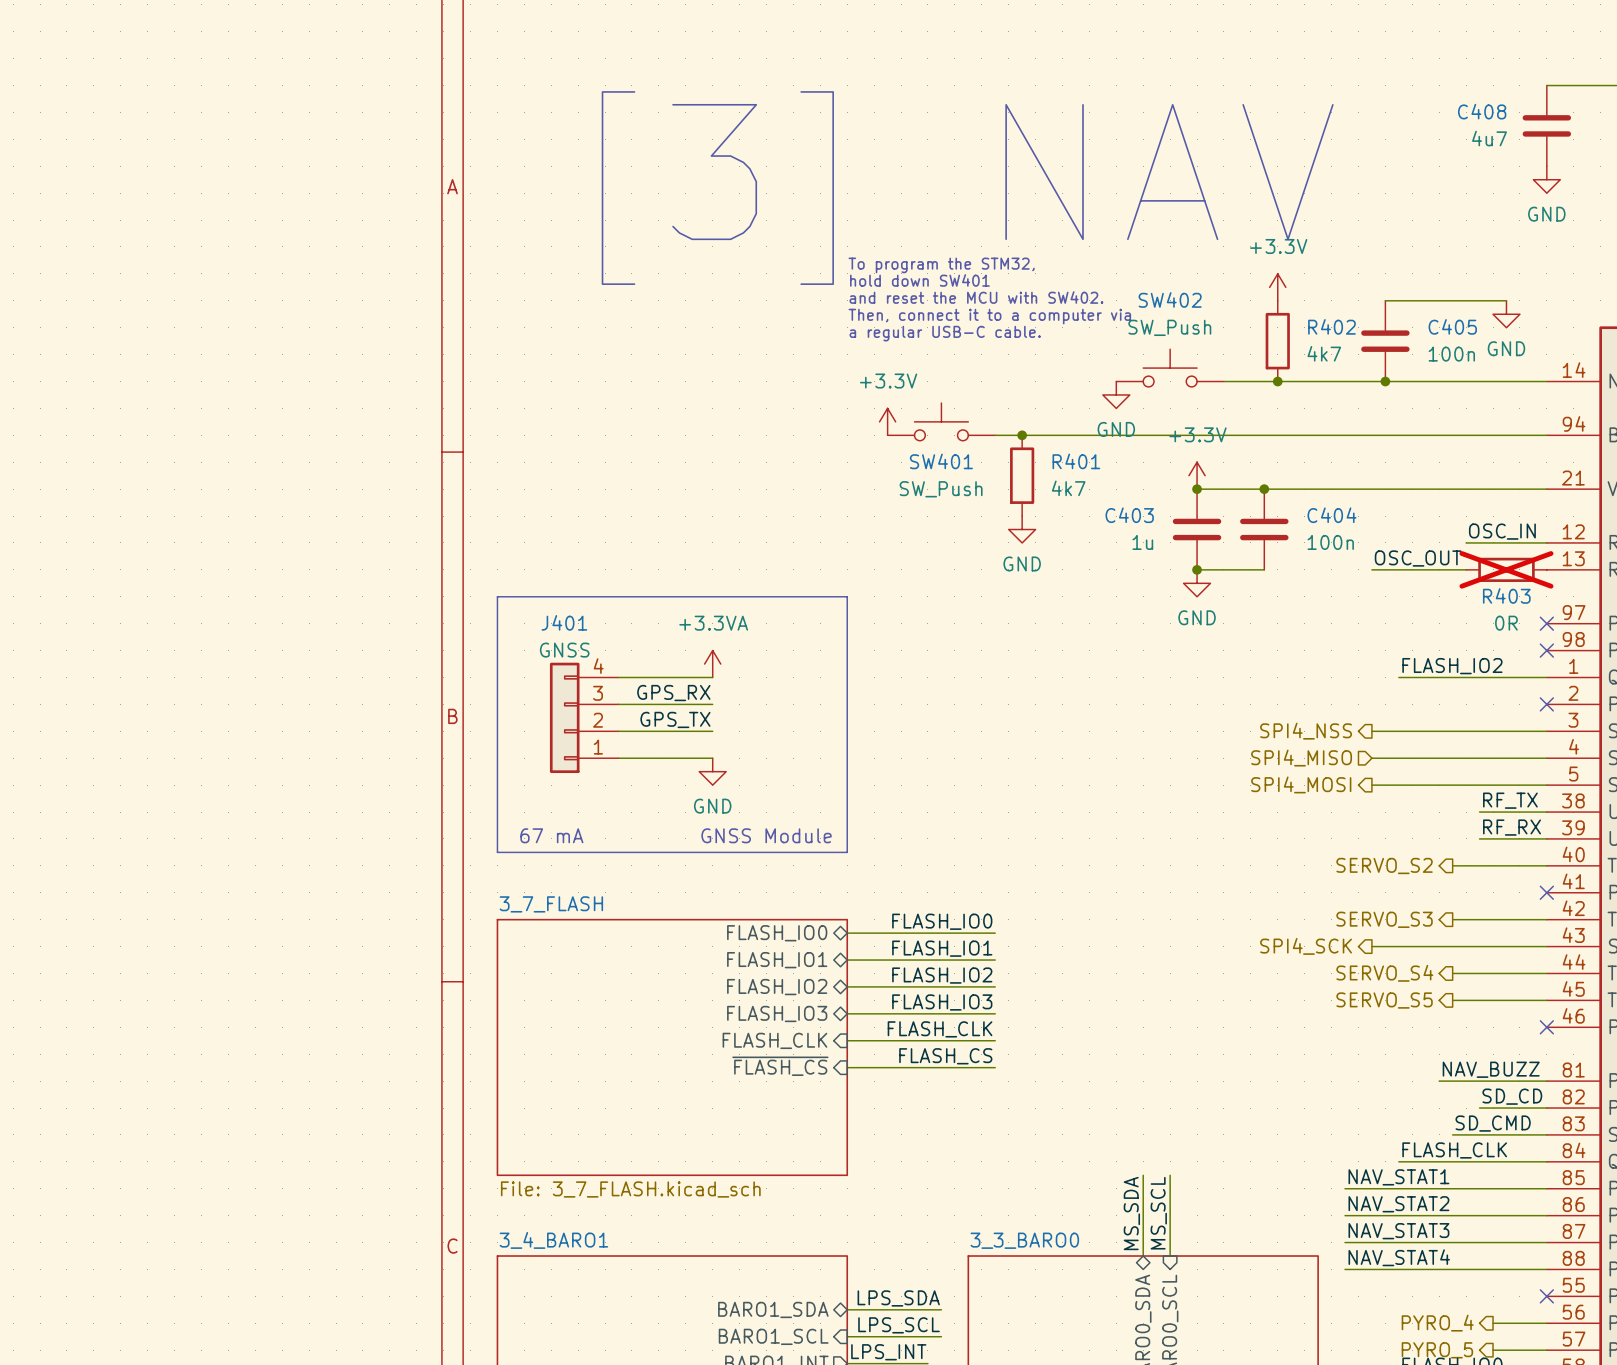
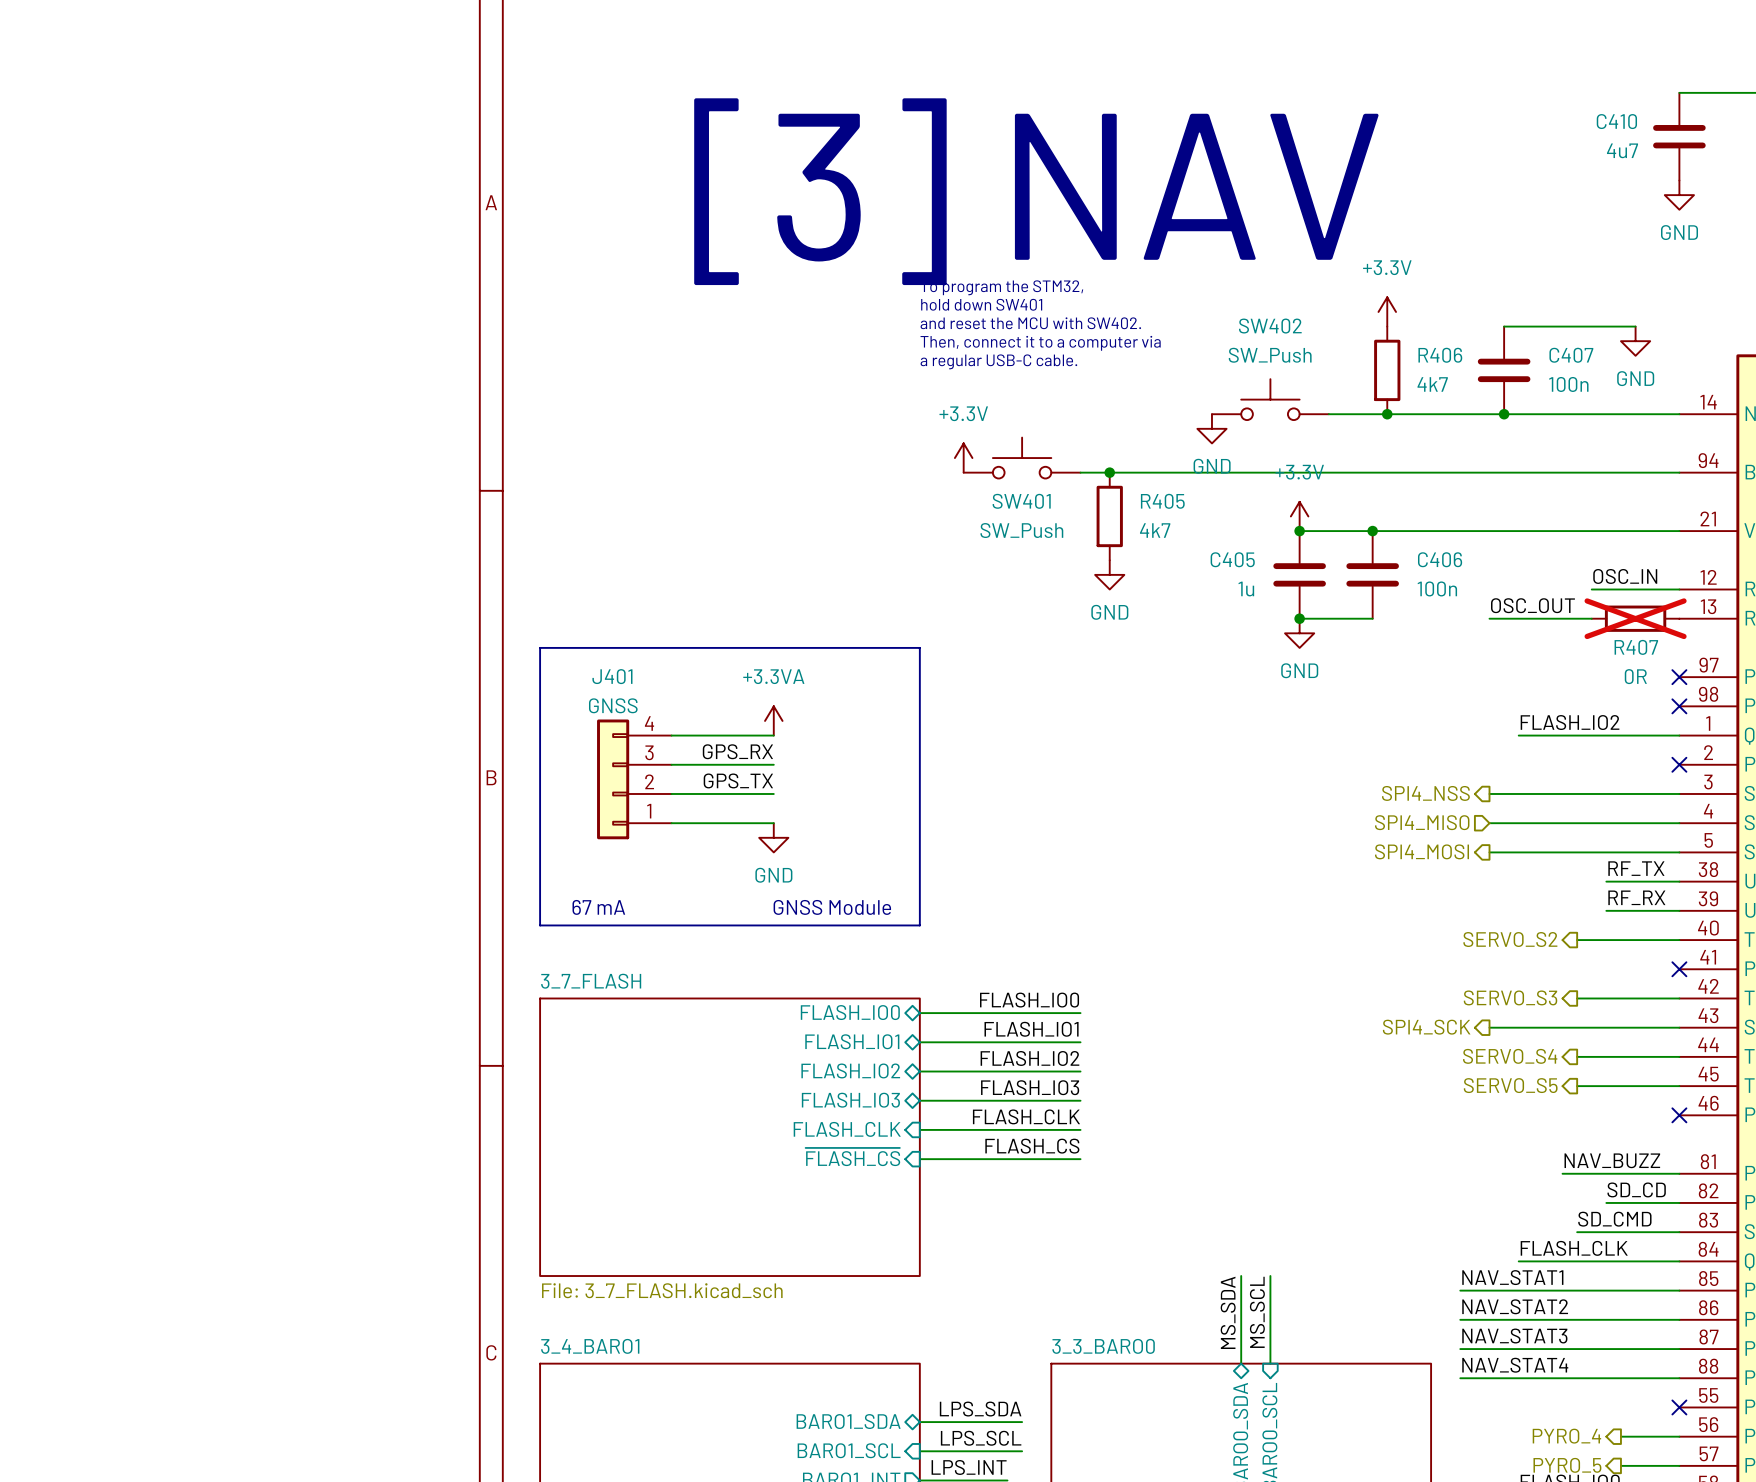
C408 name: C408 (1482, 111) -> C410 (1616, 121)
R402 name: R402 (1331, 326) -> R406 (1440, 355)
C405 name: C405 (1452, 326) -> C407 (1571, 355)
R401 name: R401 (1076, 461) -> R405 (1162, 501)
C403 name: C403 (1129, 515) -> C405 (1232, 559)
C404 name: C404 (1331, 515) -> C406 (1440, 559)
R403 name: R403 (1506, 595) -> R407 (1636, 647)

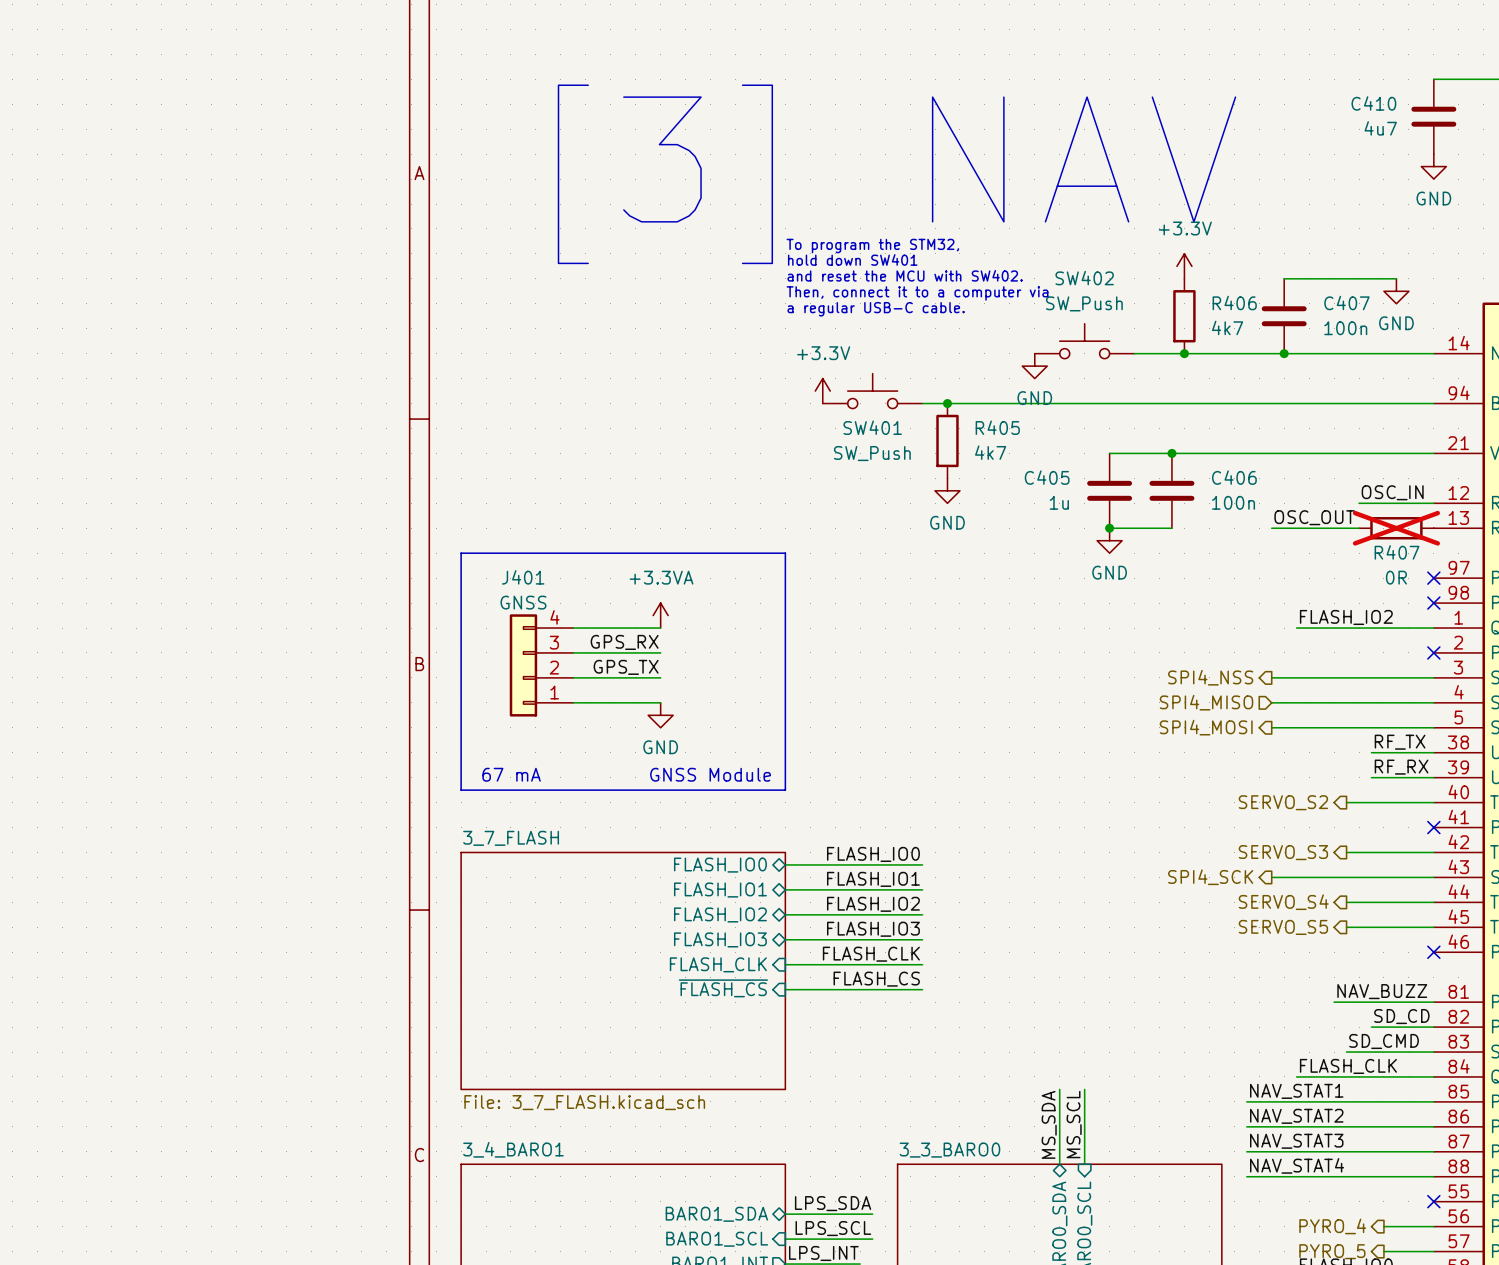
power symbol: +3.3V (1299, 516) -> none
junction: (1299, 531) -> none

